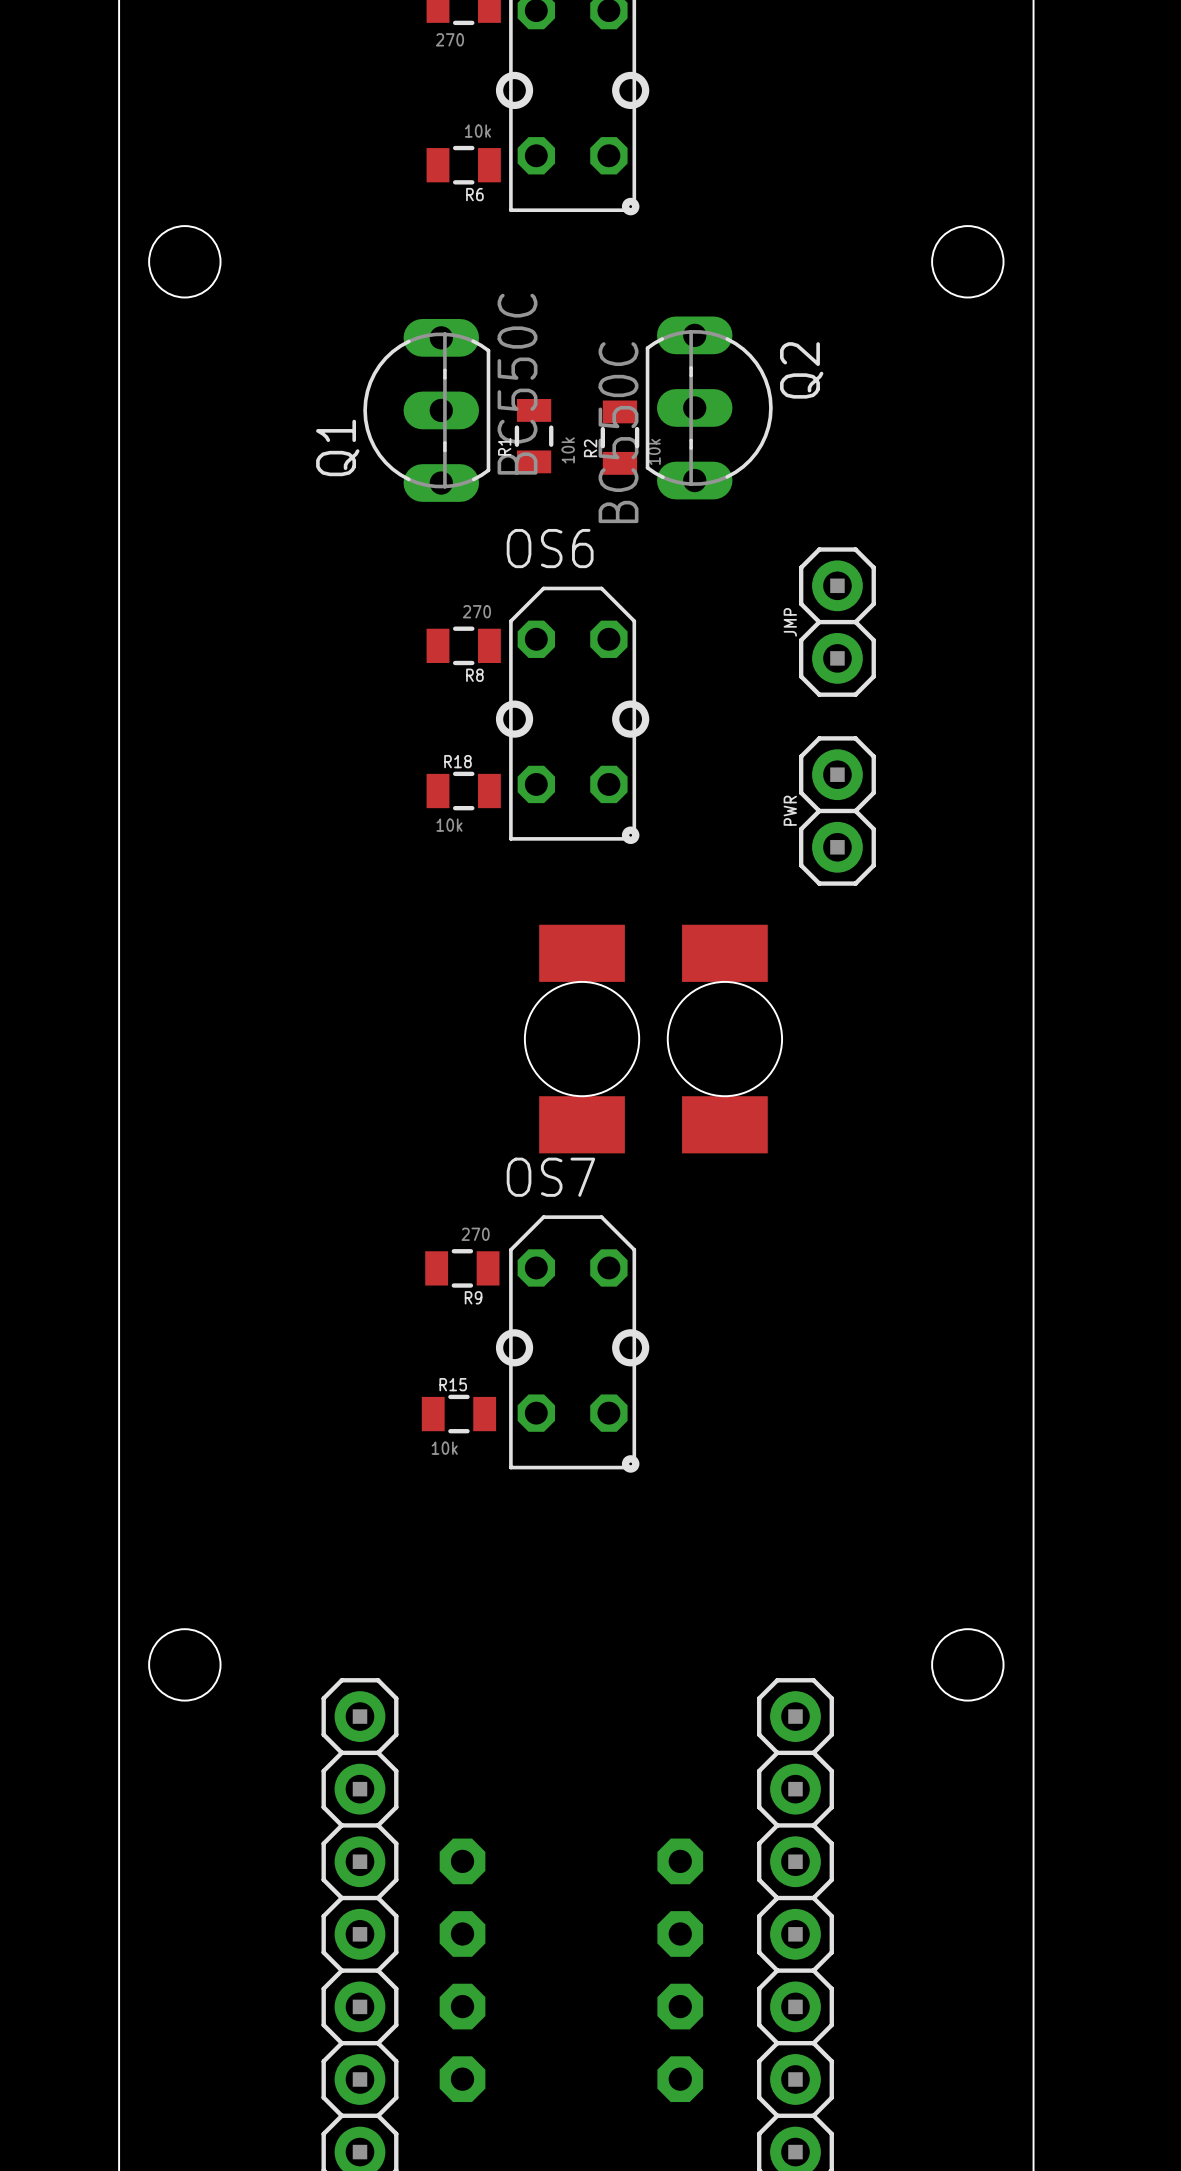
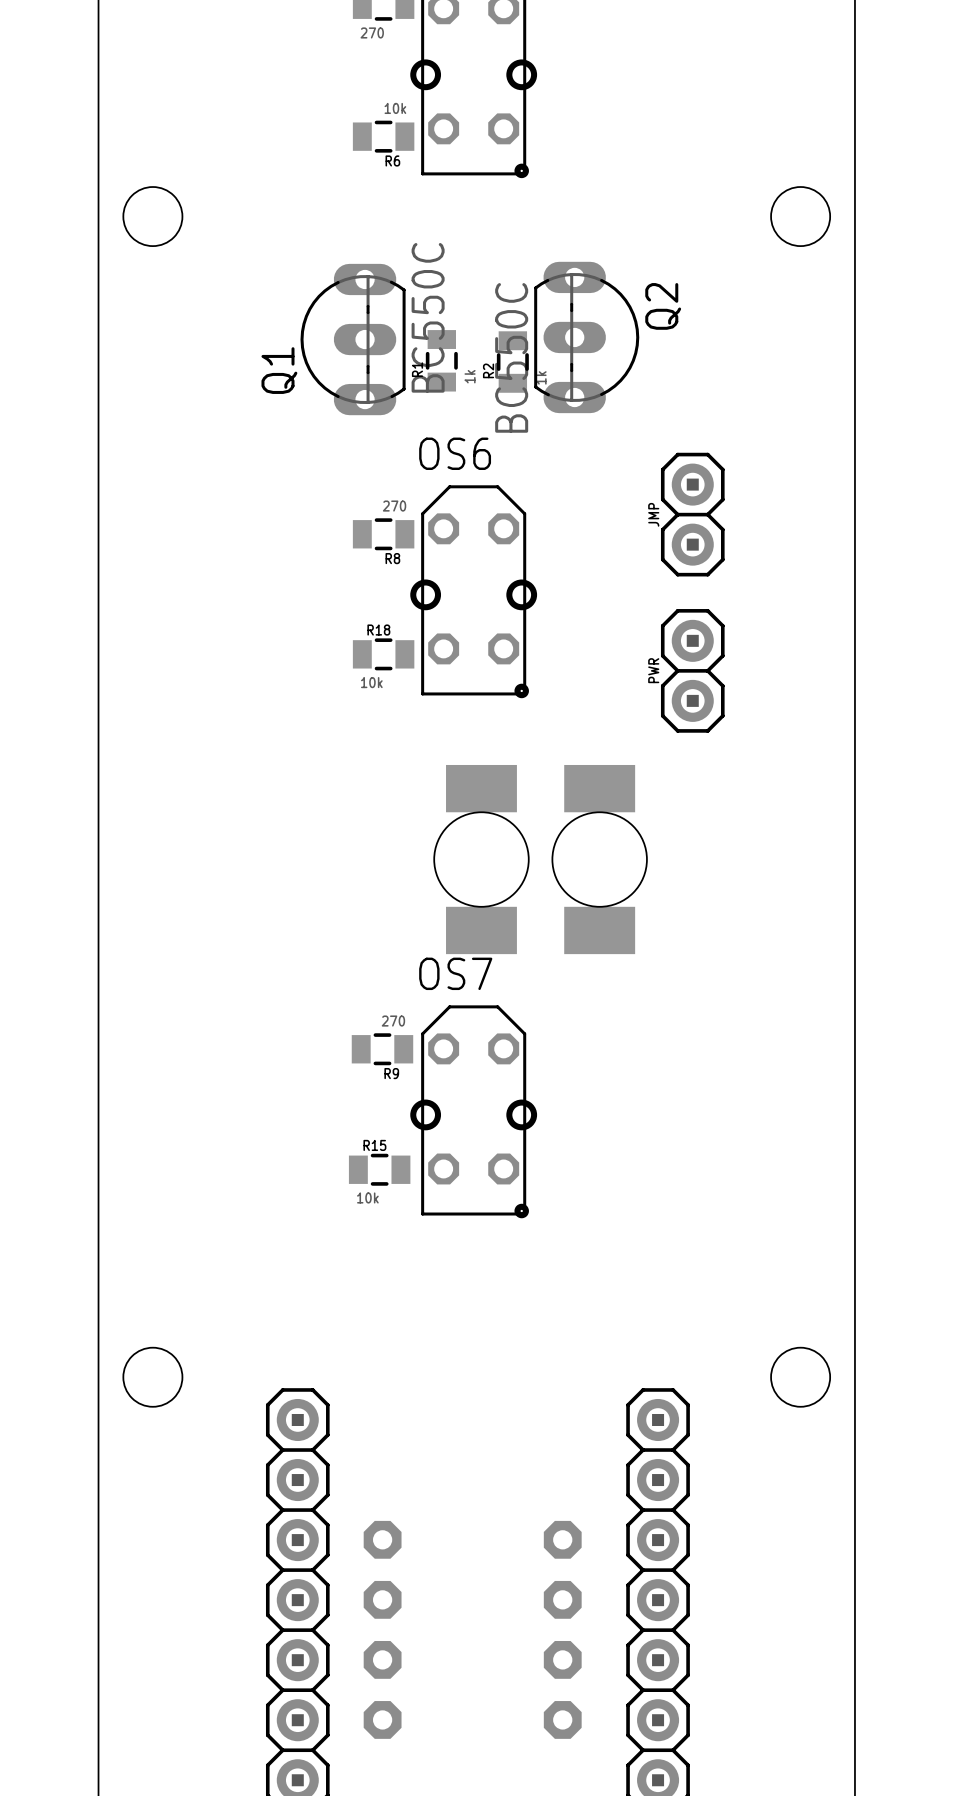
R1 value: 10k (568, 450) -> 1k (470, 376)
R2 value: 10k (654, 451) -> 1k (541, 377)

